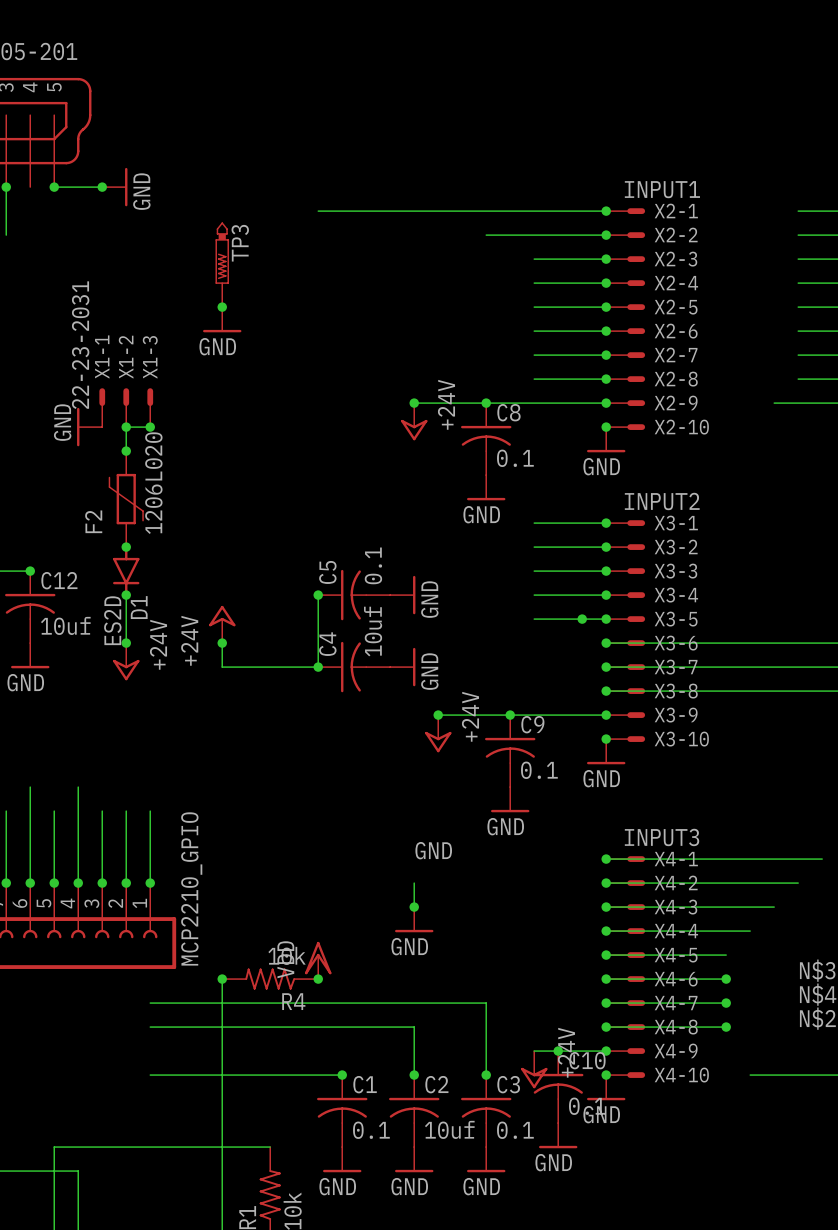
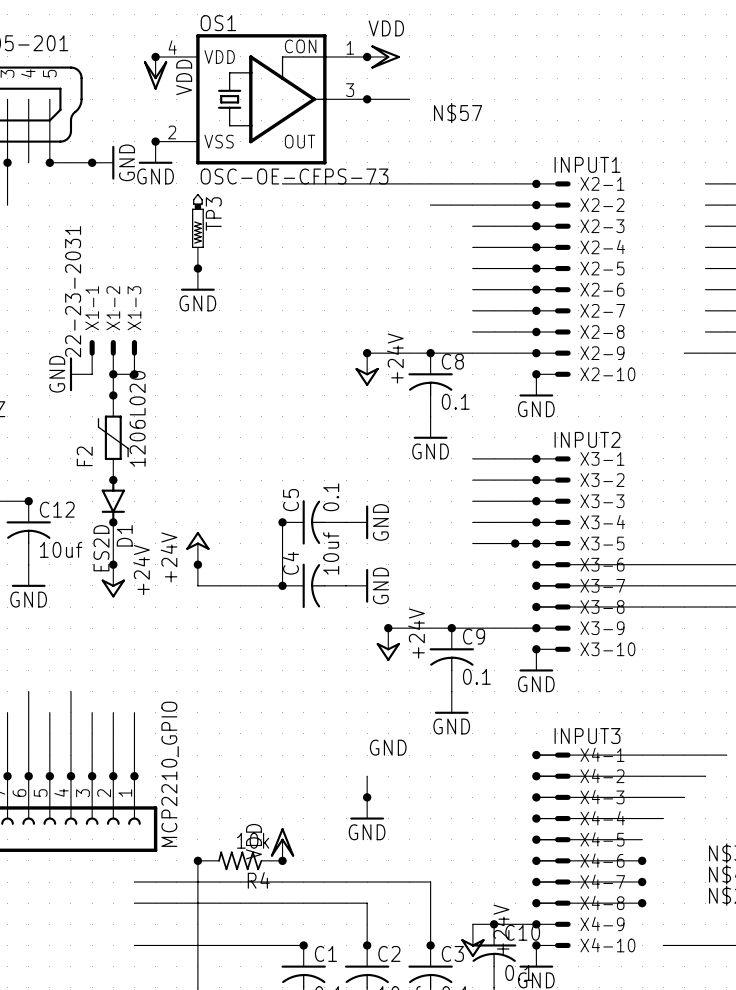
junction: none -> (155, 56)
junction: none -> (367, 56)
power symbol: none -> VDD (383, 56)
power symbol: none -> VDD (155, 73)
OS1: none -> OSC-OE-CFPS-73 (261, 99)
wire: none -> (367, 99) (409, 99)
junction: none -> (367, 99)
label: none -> N$57 (458, 113)
junction: none -> (155, 141)
power symbol: none -> GND (155, 152)

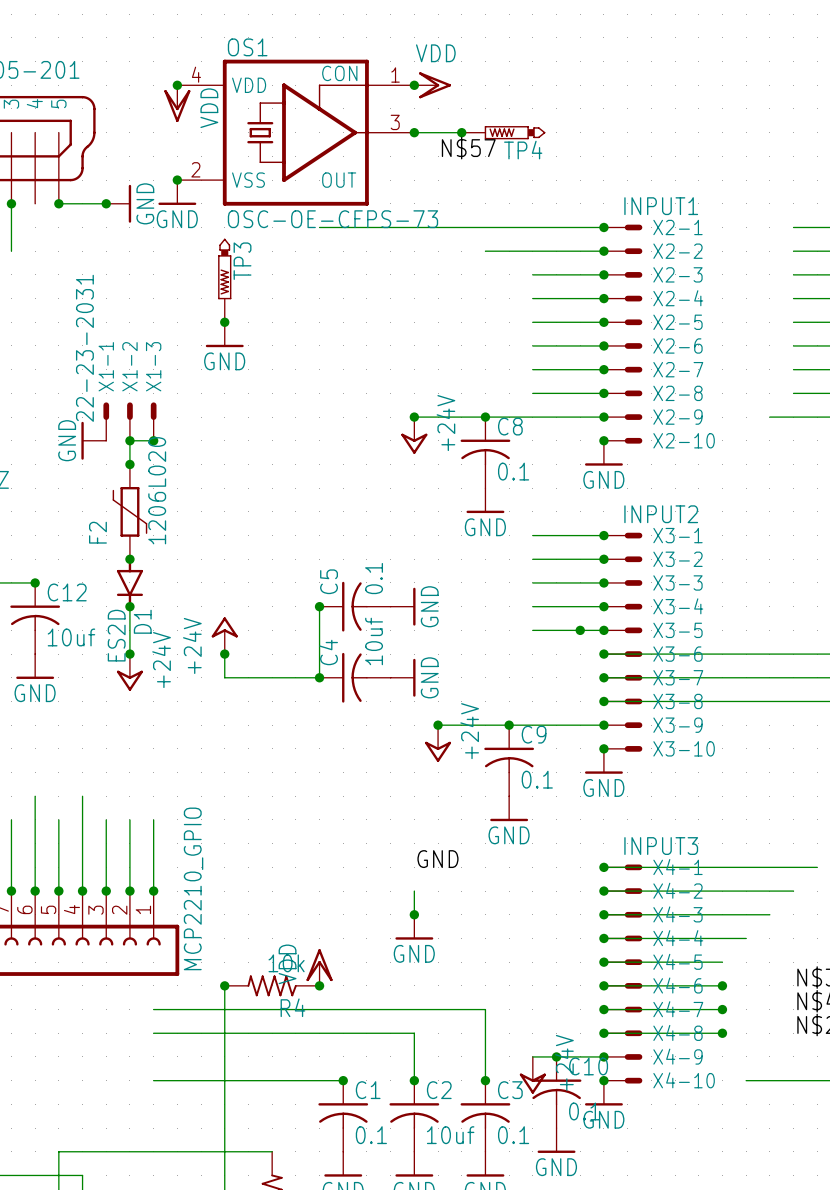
junction: none -> (461, 132)
TP4: none -> (503, 132)
label position: N$57 (458, 113) -> N$57 (468, 148)

